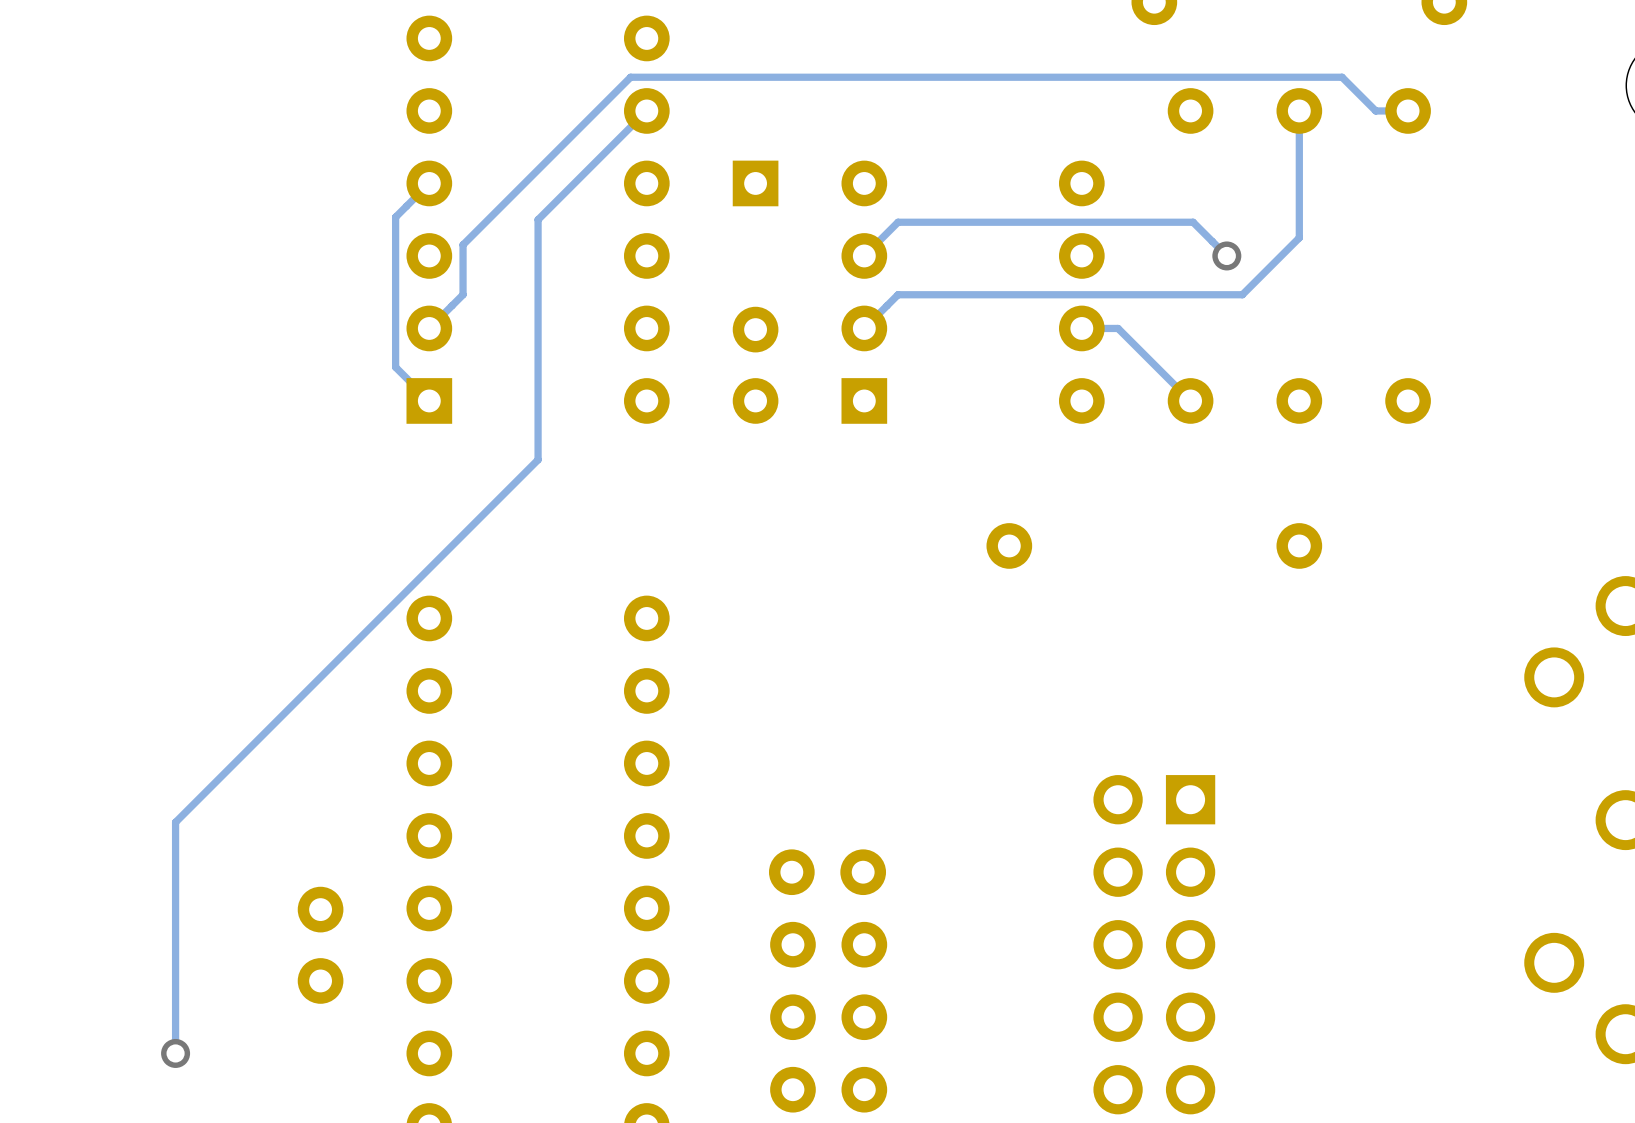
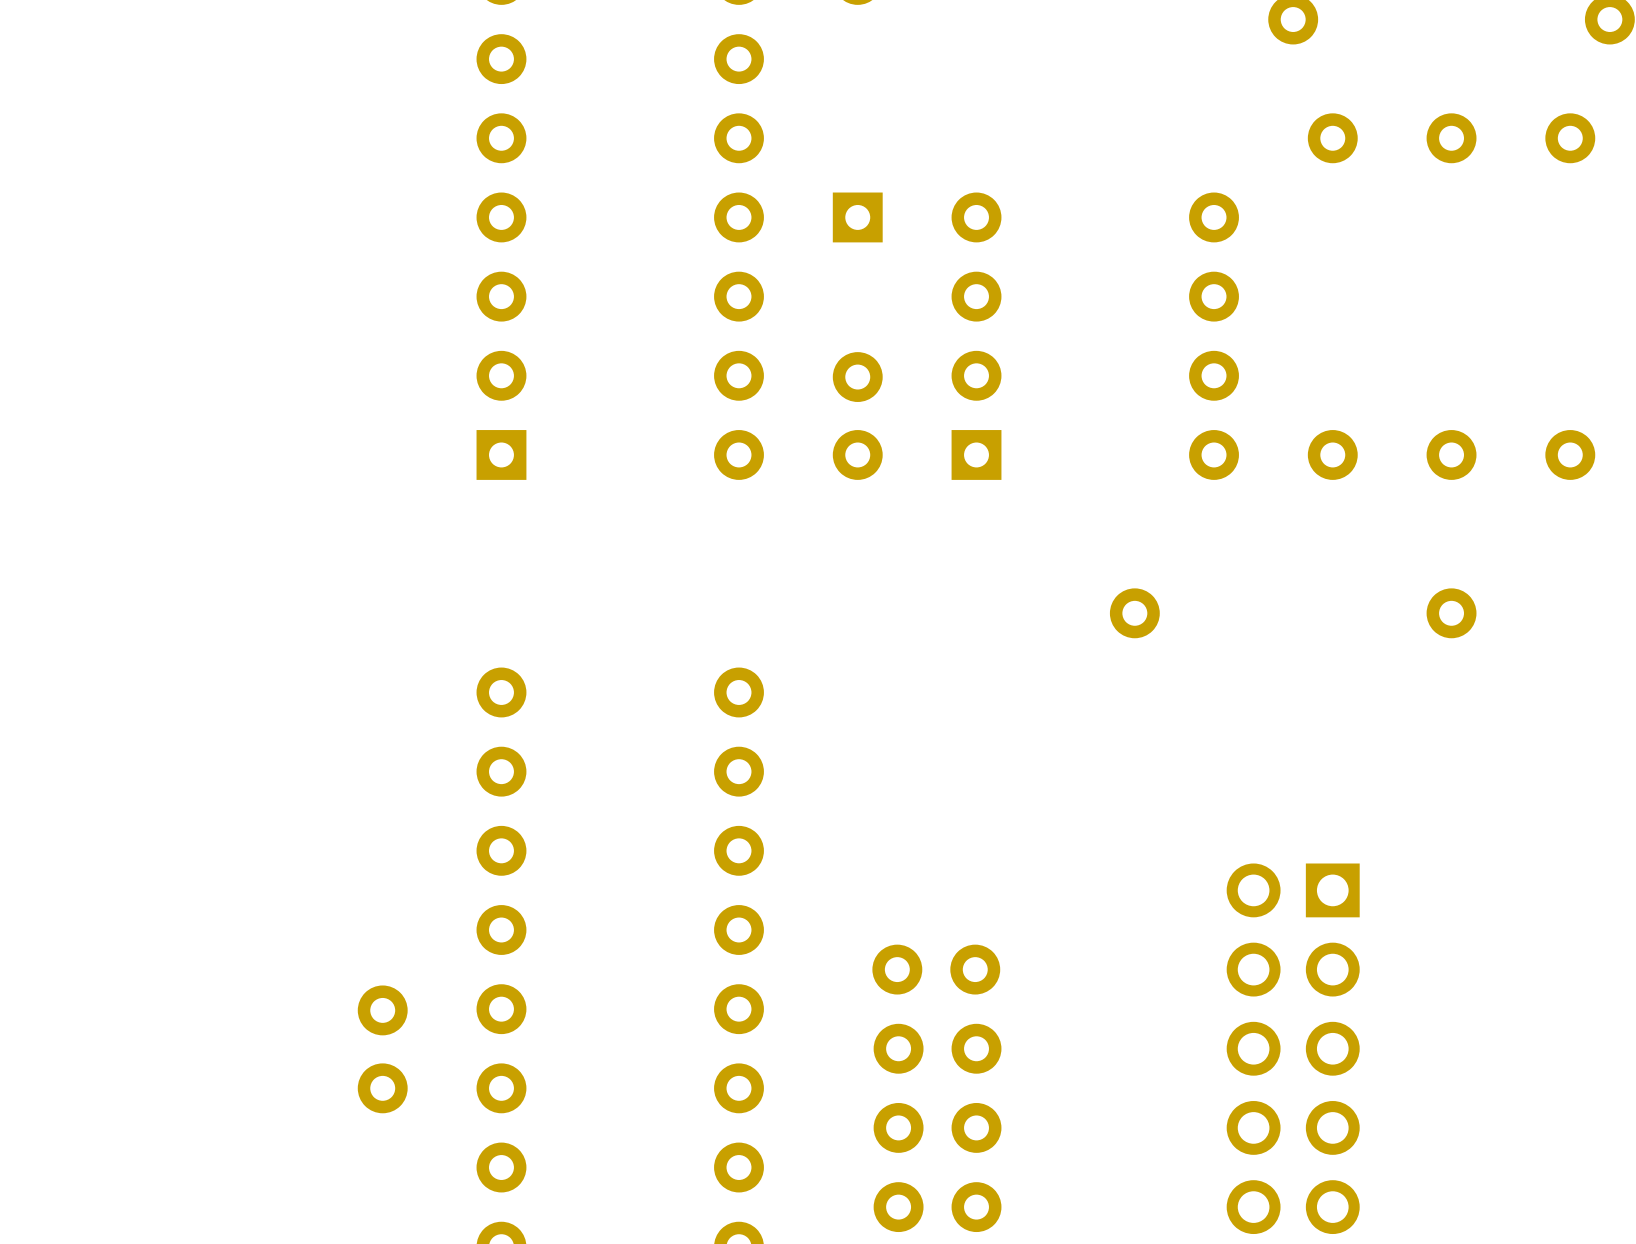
track: (646, 110) (538, 219) (538, 459) (175, 822) (175, 1053) -> none
track: (1299, 110) (1299, 237) (1242, 294) (898, 294) (864, 328) -> none
track: (1408, 110) (1375, 110) (1342, 77) (630, 77) (463, 244) (463, 294) (429, 328) -> none
track: (429, 183) (395, 217) (395, 367) (429, 400) -> none
track: (1226, 255) (1193, 222) (898, 222) (864, 255) -> none
via: (1226, 255) -> none
track: (1081, 328) (1118, 328) (1190, 400) -> none
via: (175, 1053) -> none

